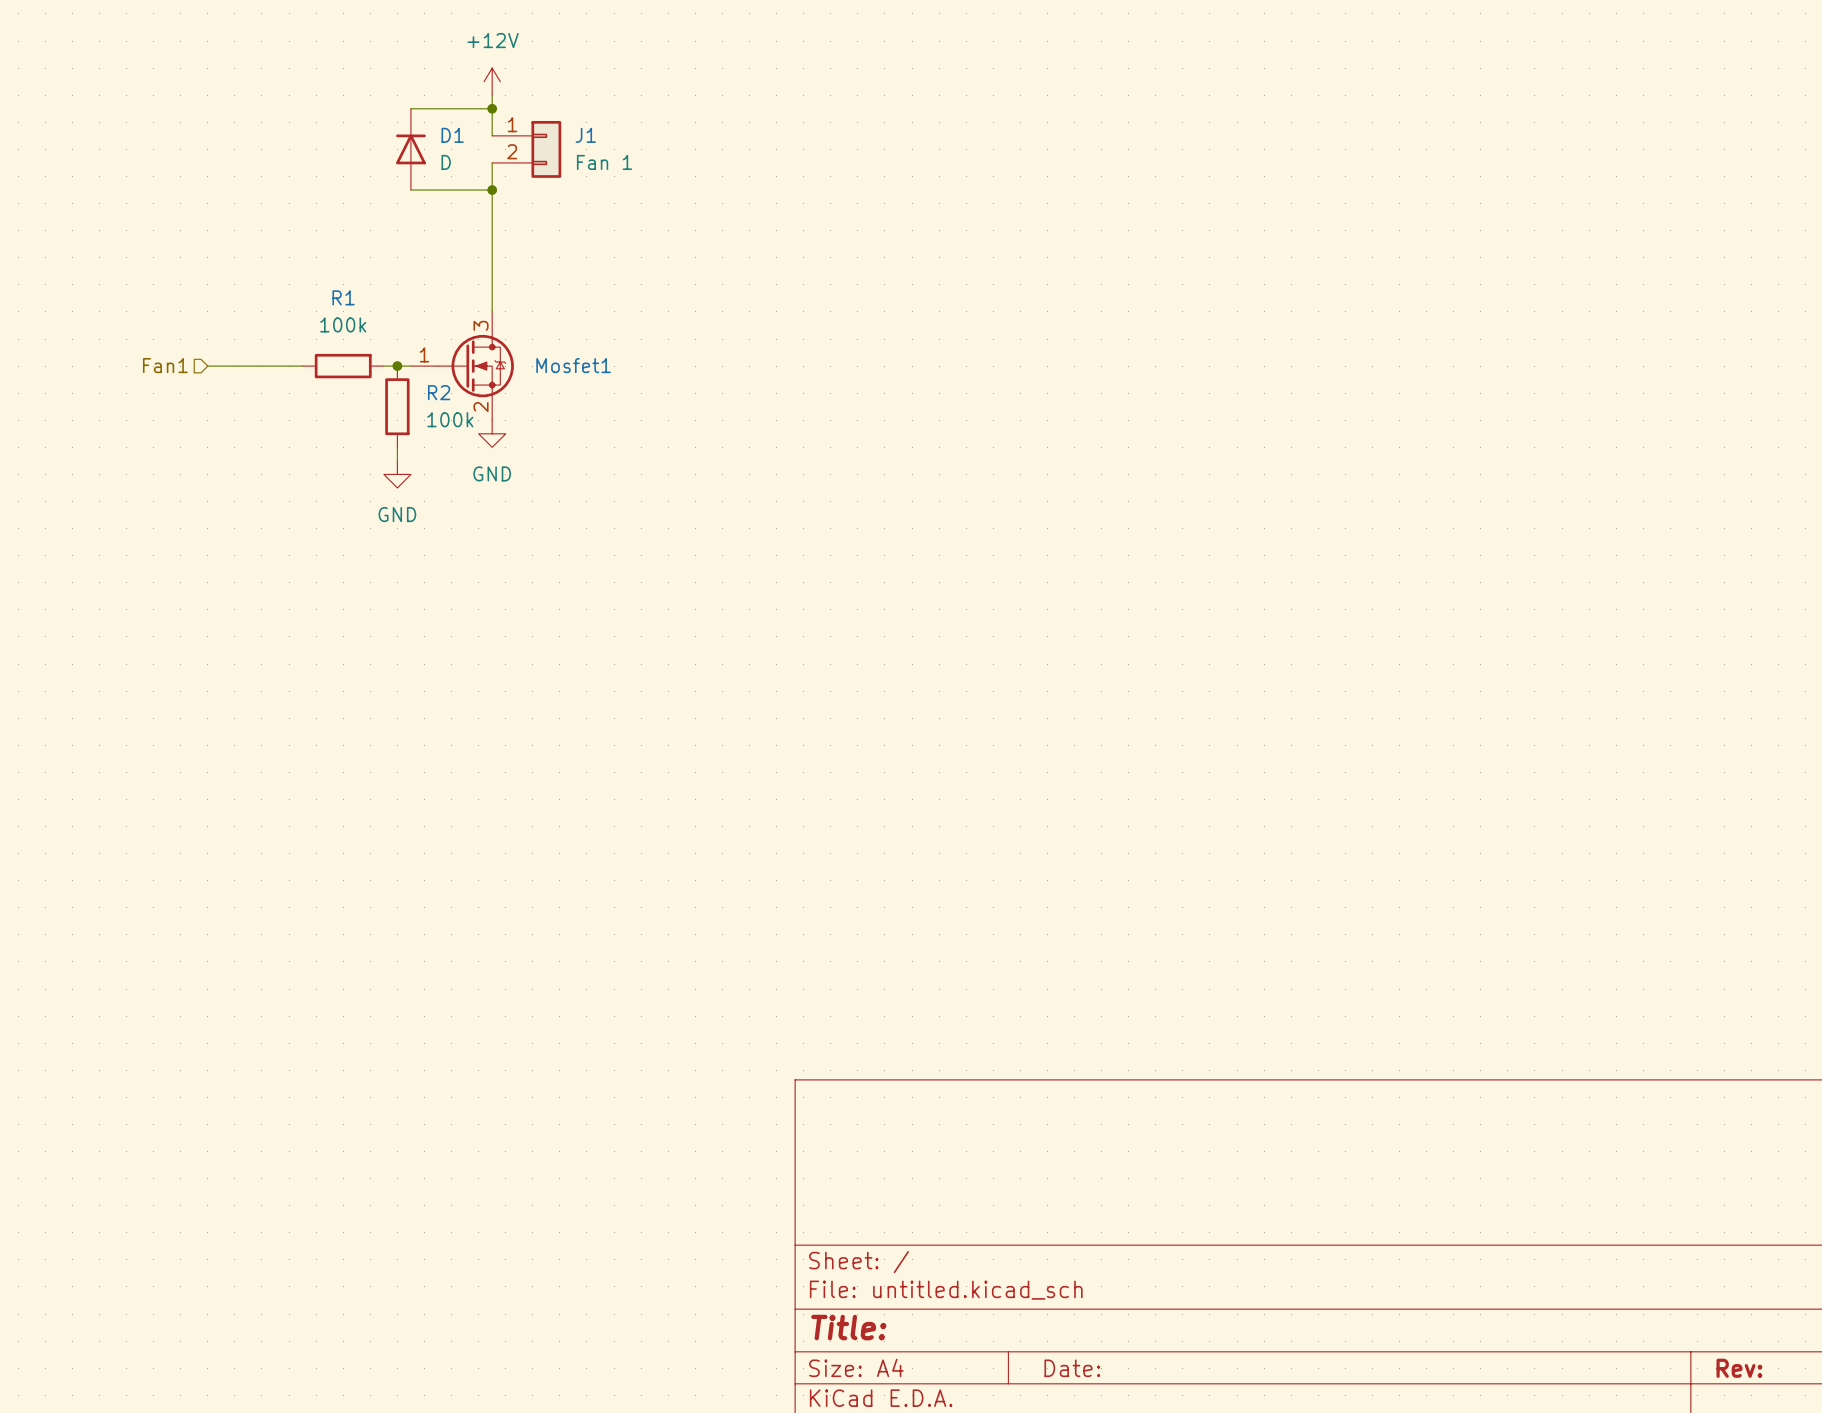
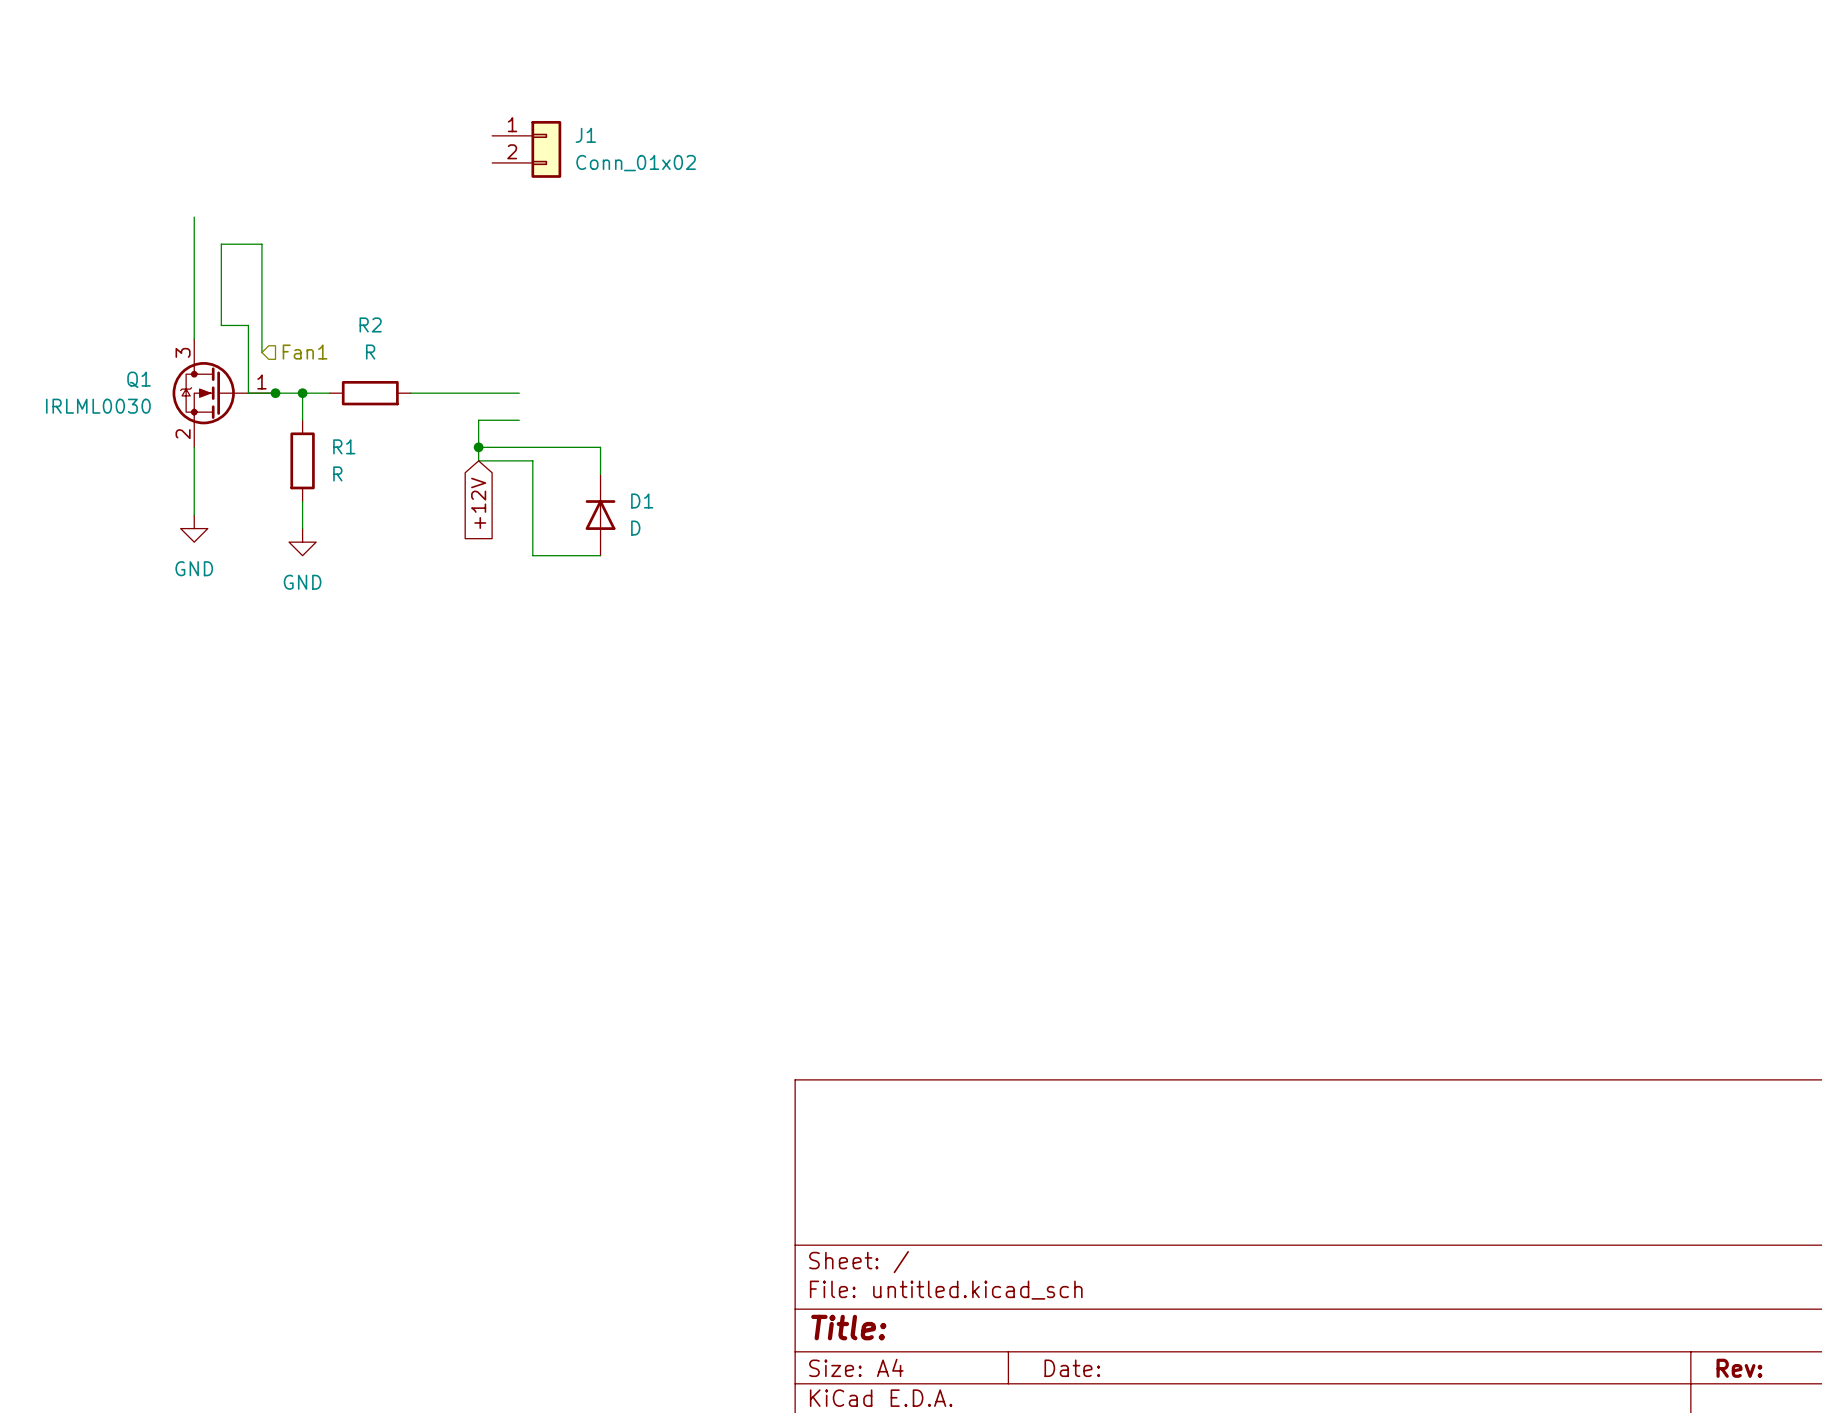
power symbol: +12V (492, 81) -> none
wire: (492, 95) (492, 135) -> none
wire: (410, 108) (492, 108) -> none
junction: (492, 108) -> none
D1 position: (410, 149) -> (600, 515)
wire: (492, 162) (492, 311) -> none
J1 value: Fan 1 (604, 162) -> Conn_01x02 (636, 163)
wire: (410, 190) (492, 190) -> none
junction: (492, 190) -> none
wire: none -> (194, 217) (194, 339)
R1 name position: R1 (343, 297) -> R1 (344, 446)
R1 value: 100k (343, 324) -> R (337, 473)
wire: none -> (261, 352) (261, 244) (221, 244) (221, 325) (248, 325) (248, 393) (329, 393)
hierarchical label rotation: 0° (165, 365) -> 180° (305, 352)
hierarchical label position: Fan1 (165, 365) -> Fan1 (305, 352)
wire: (207, 366) (302, 366) -> none
R1 rotation: 0° (343, 366) -> 90° clockwise (302, 460)
R1 position: (343, 366) -> (302, 460)
wire: (383, 366) (410, 366) -> none
junction: (397, 366) -> none
Mosfet1: (462, 366) -> none
R2 name position: R2 (439, 392) -> R2 (370, 324)
Q1: none -> IRLML0030 (224, 393)
junction: none -> (275, 393)
wire: none -> (302, 393) (302, 420)
junction: none -> (302, 393)
wire: none -> (410, 393) (519, 393)
R2 rotation: 0° (397, 406) -> 90° clockwise (370, 393)
R2 value: 100k (450, 419) -> R (370, 352)
wire: none -> (519, 420) (478, 420) (478, 460) (532, 460) (532, 555) (600, 555)
power symbol: GND (492, 433) -> none
wire: none -> (194, 447) (194, 515)
wire: (397, 447) (397, 460) -> none
wire: none -> (478, 447) (600, 447) (600, 474)
junction: none -> (478, 447)
power symbol: GND (397, 474) -> none
wire: none -> (302, 501) (302, 528)
global label: none -> +12V (478, 503)
power symbol: none -> GND (194, 528)
power symbol: none -> GND (302, 542)

